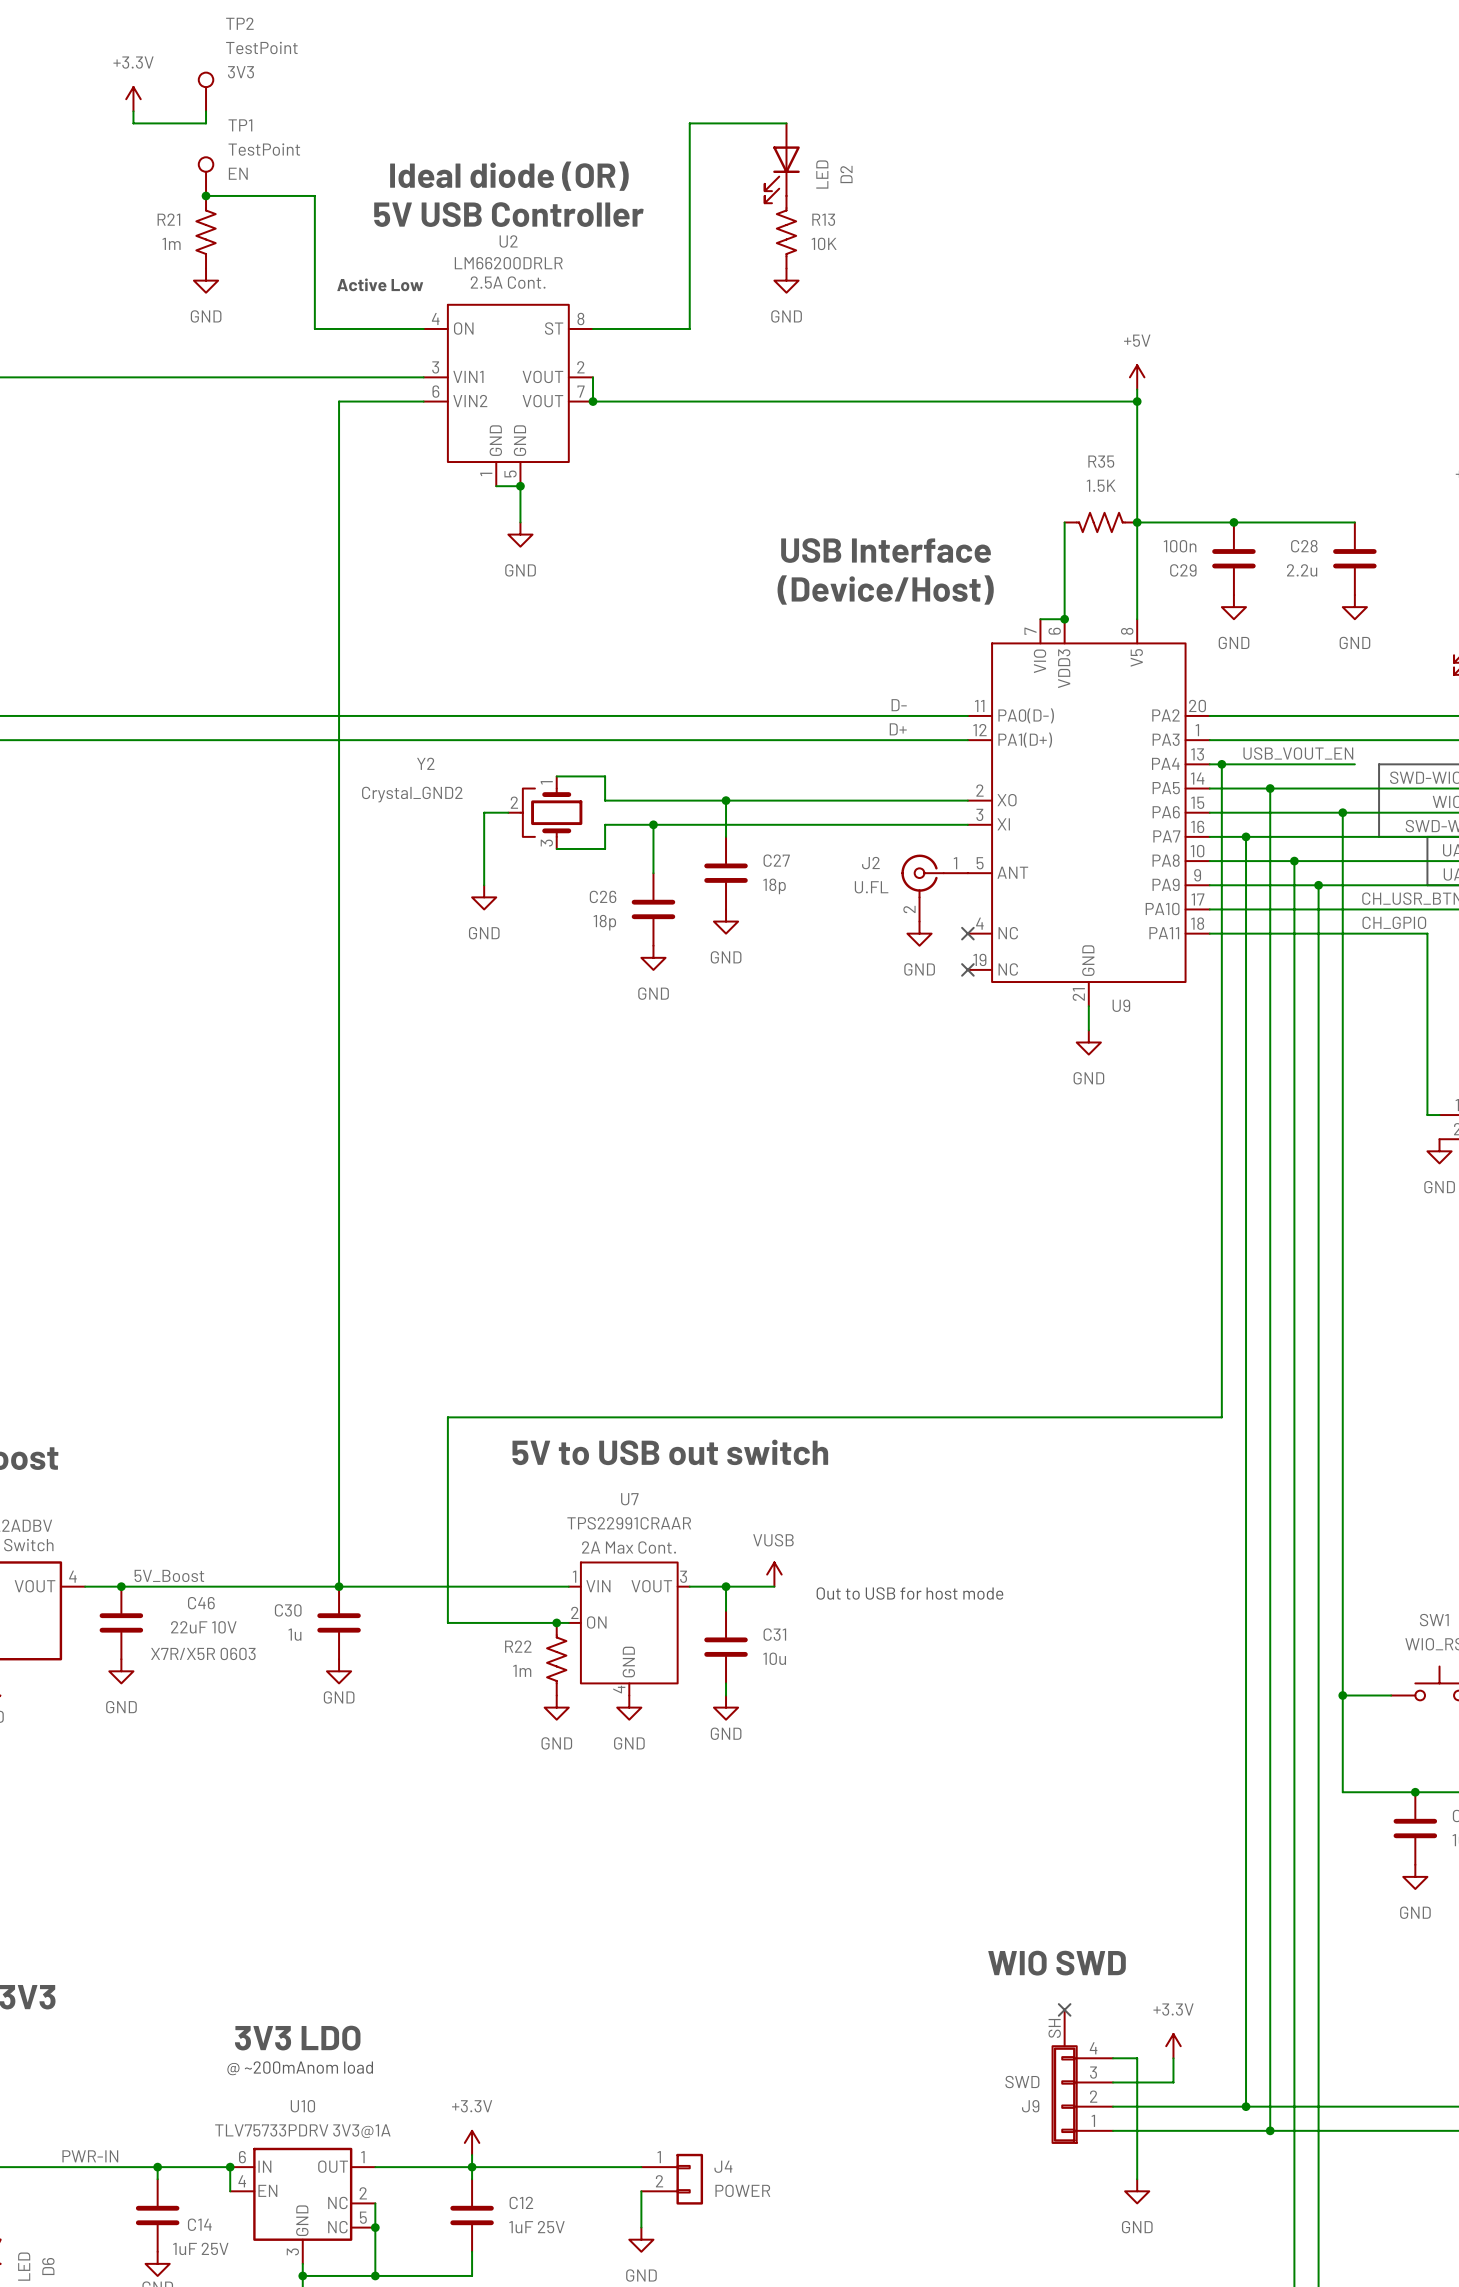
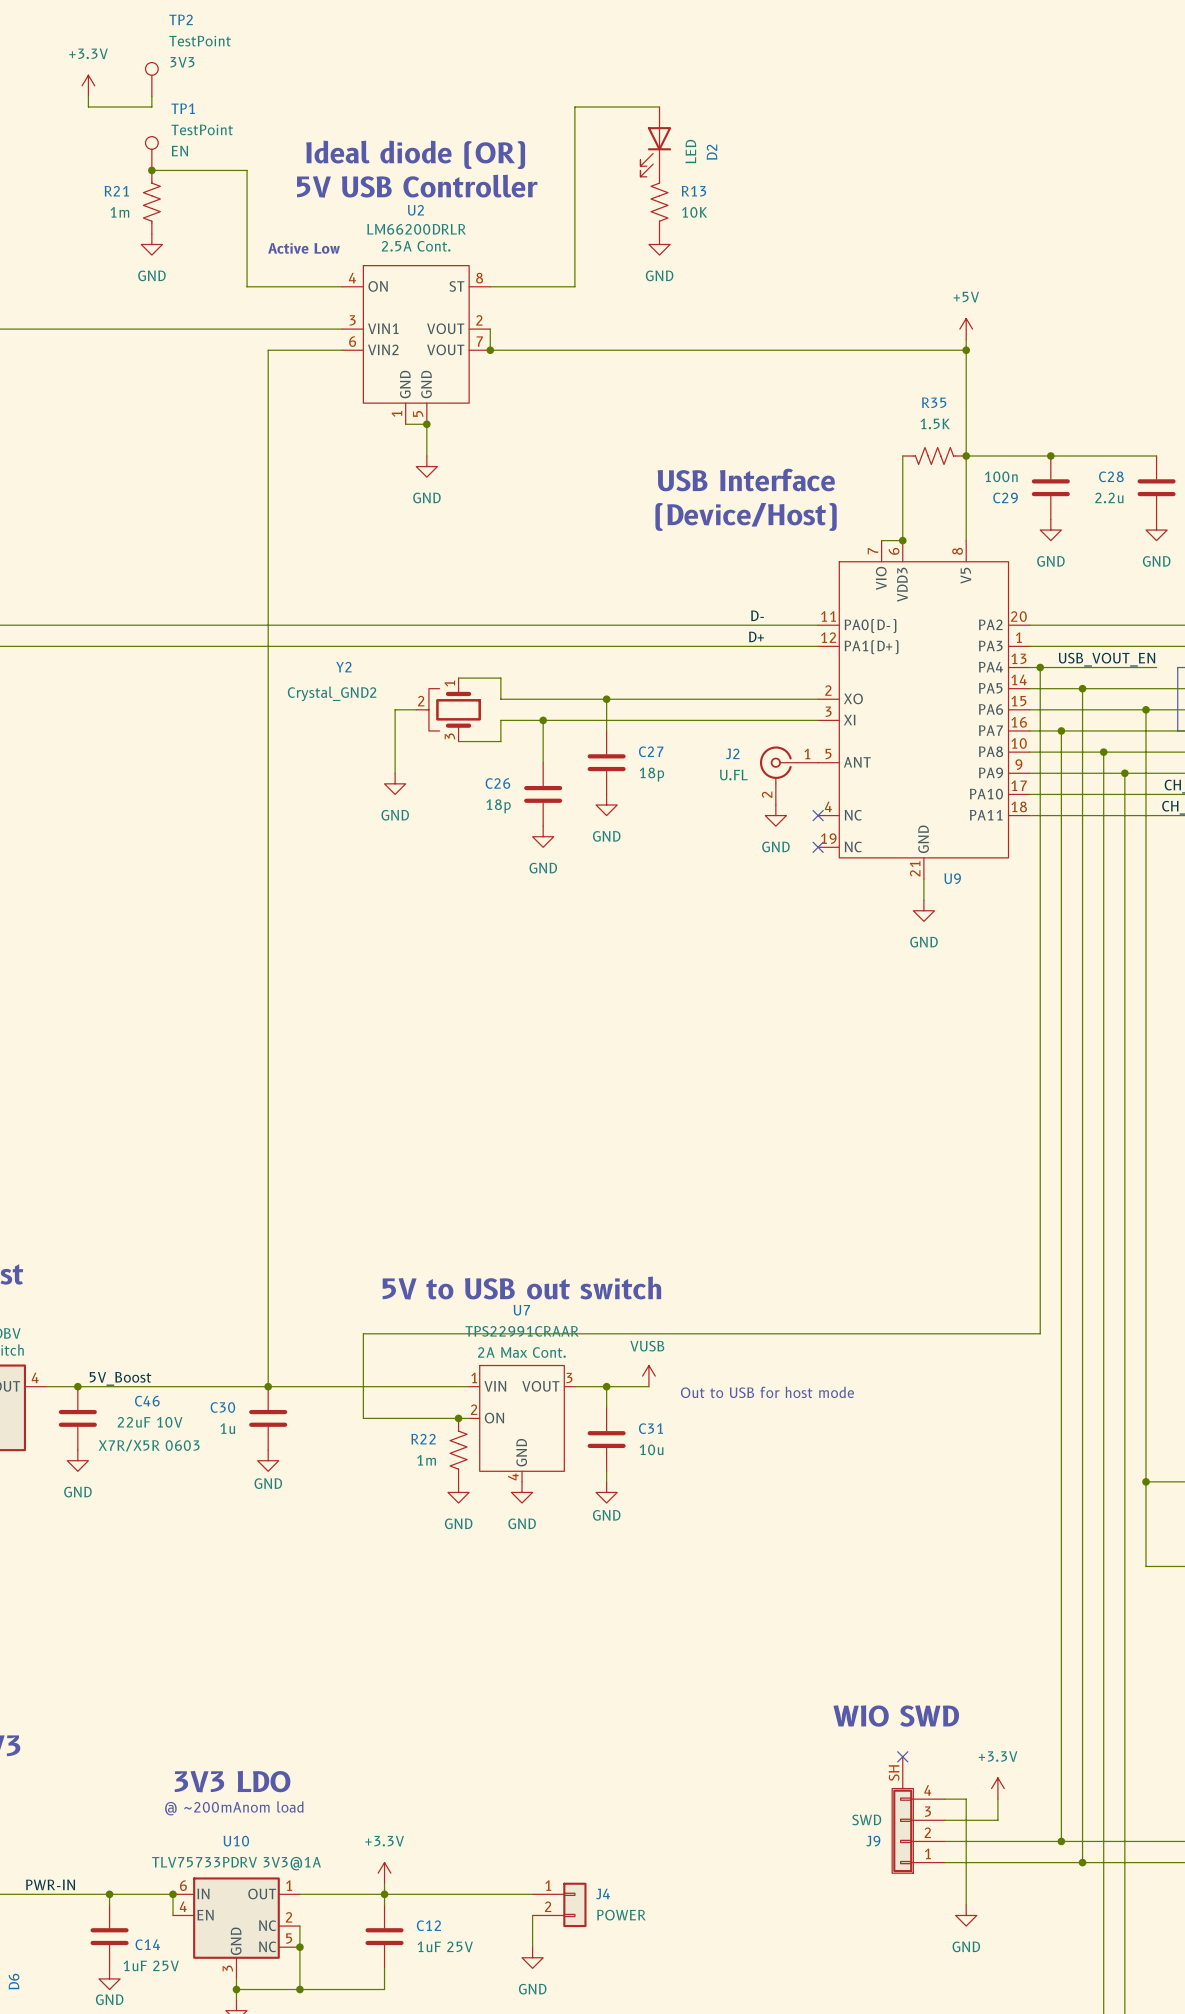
wire: (1221, 1417) (447, 1417) (447, 1526) -> (1040, 1238) (1040, 1333) (363, 1333)
text position: 5V to USB out switch (670, 1452) -> 5V to USB out switch (521, 1288)

